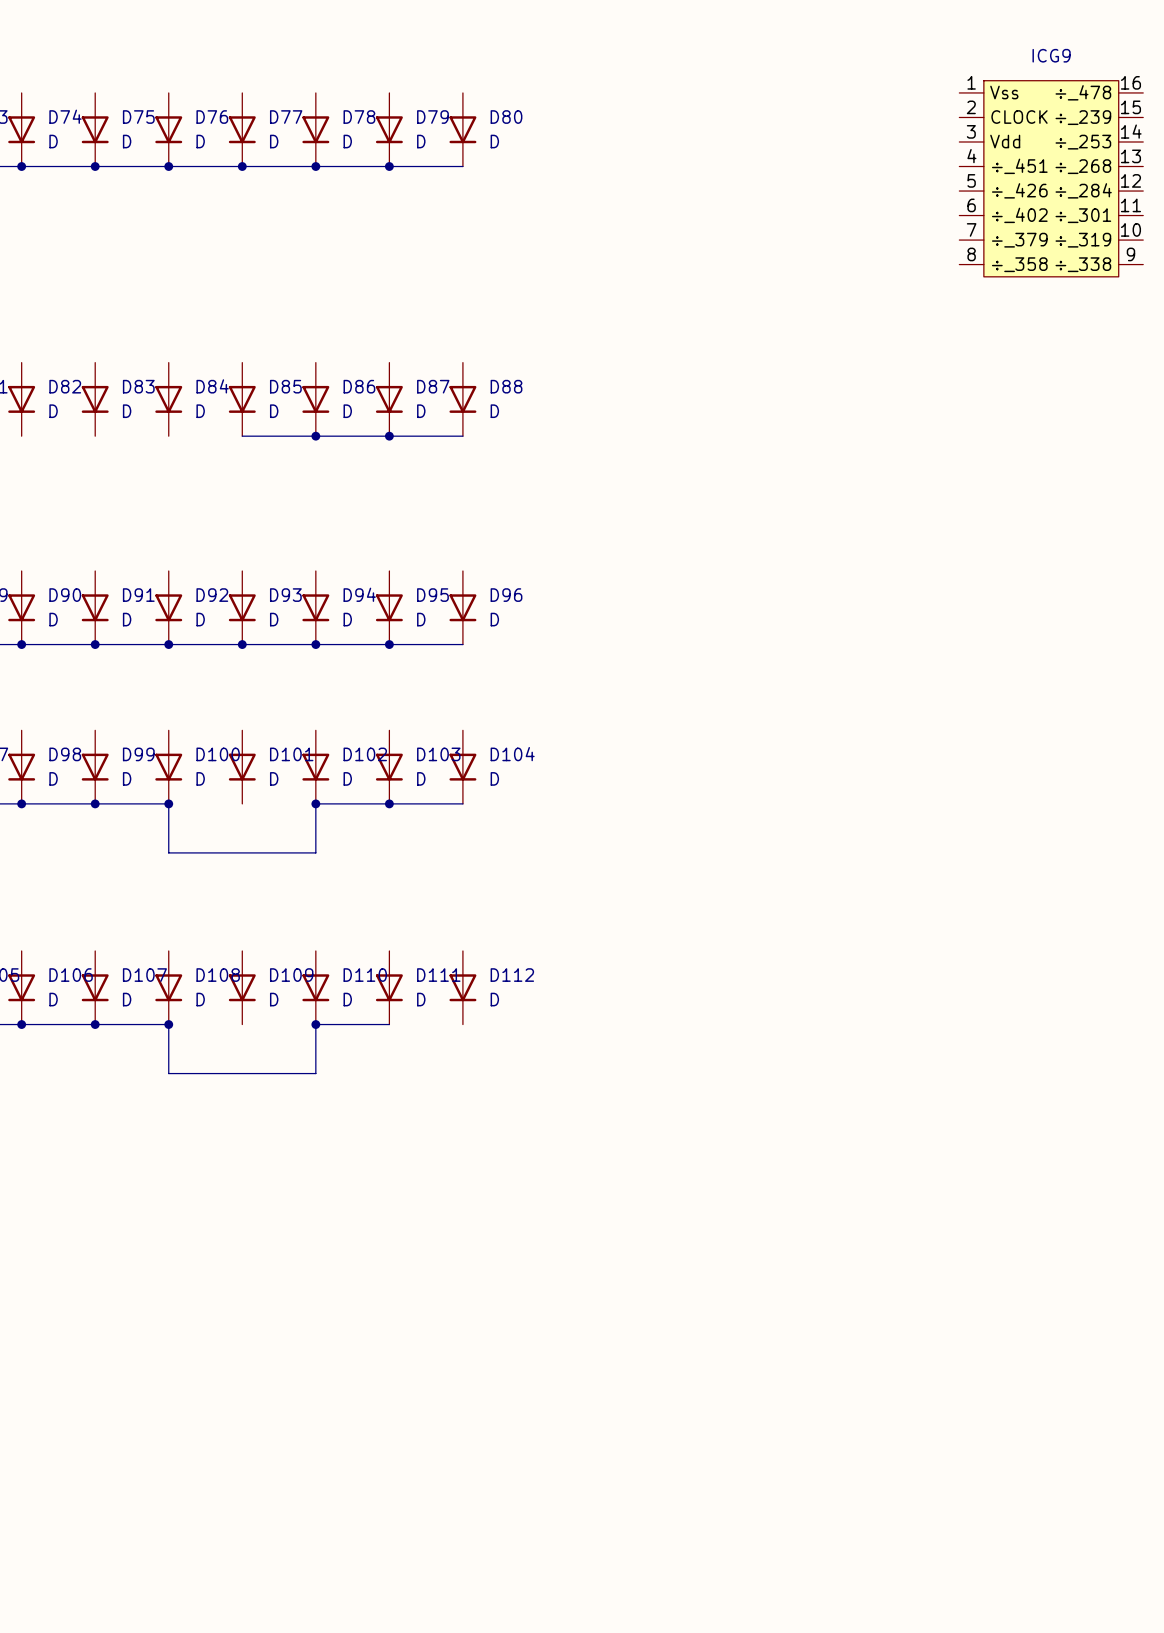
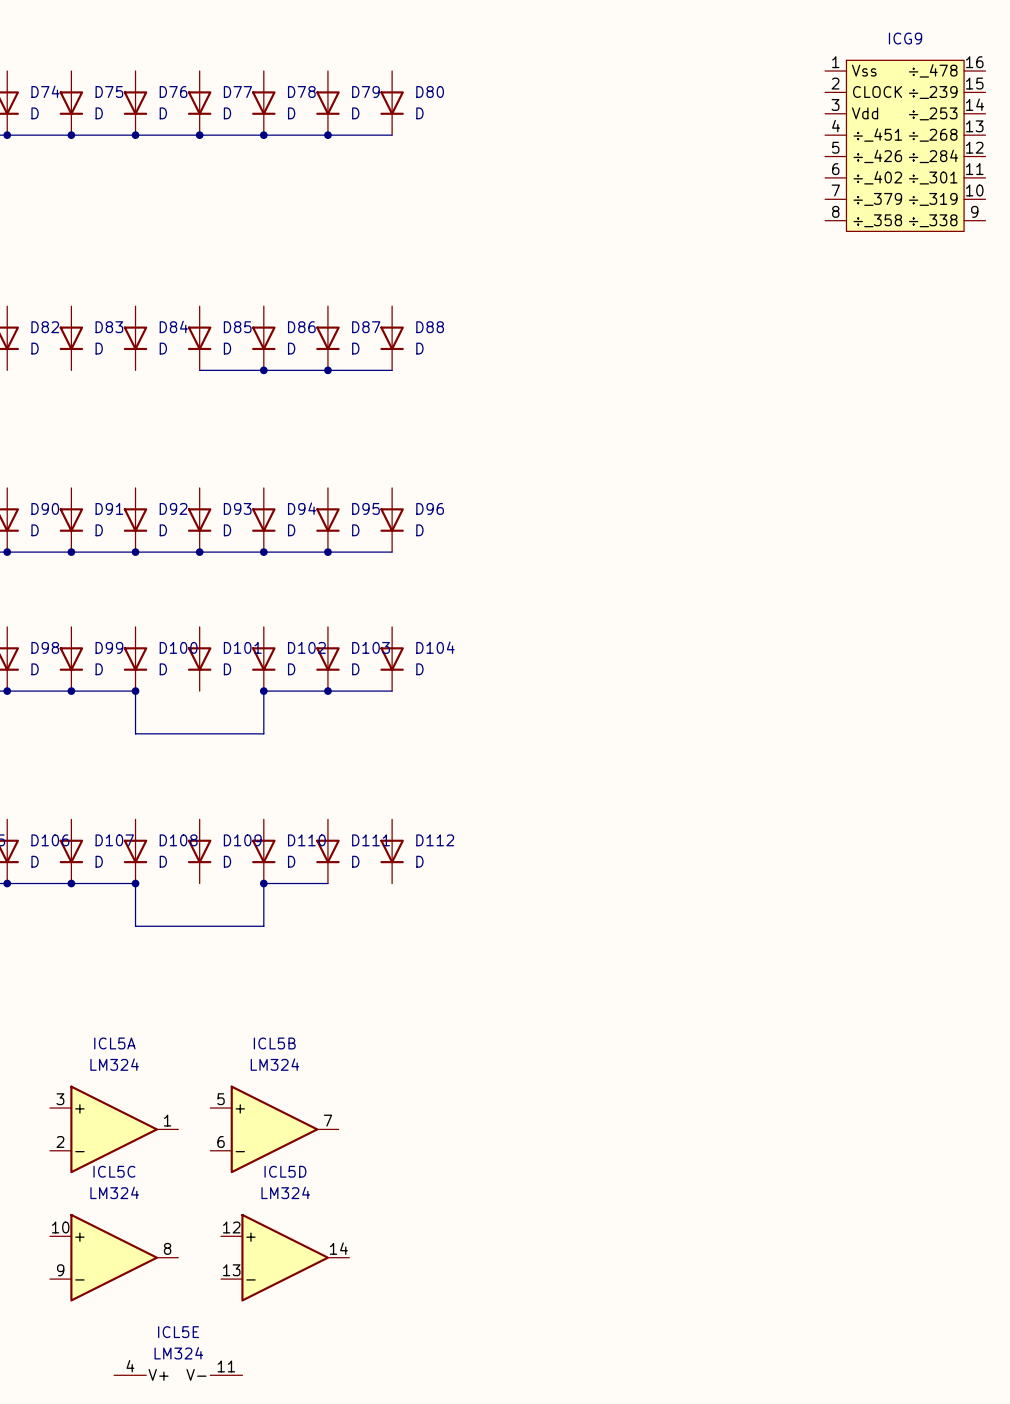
ICL5A: none -> LM324 (114, 1129)
ICL5B: none -> LM324 (274, 1129)
ICL5C: none -> LM324 (114, 1257)
ICL5D: none -> LM324 (285, 1257)
ICL5E: none -> LM324 (178, 1375)

